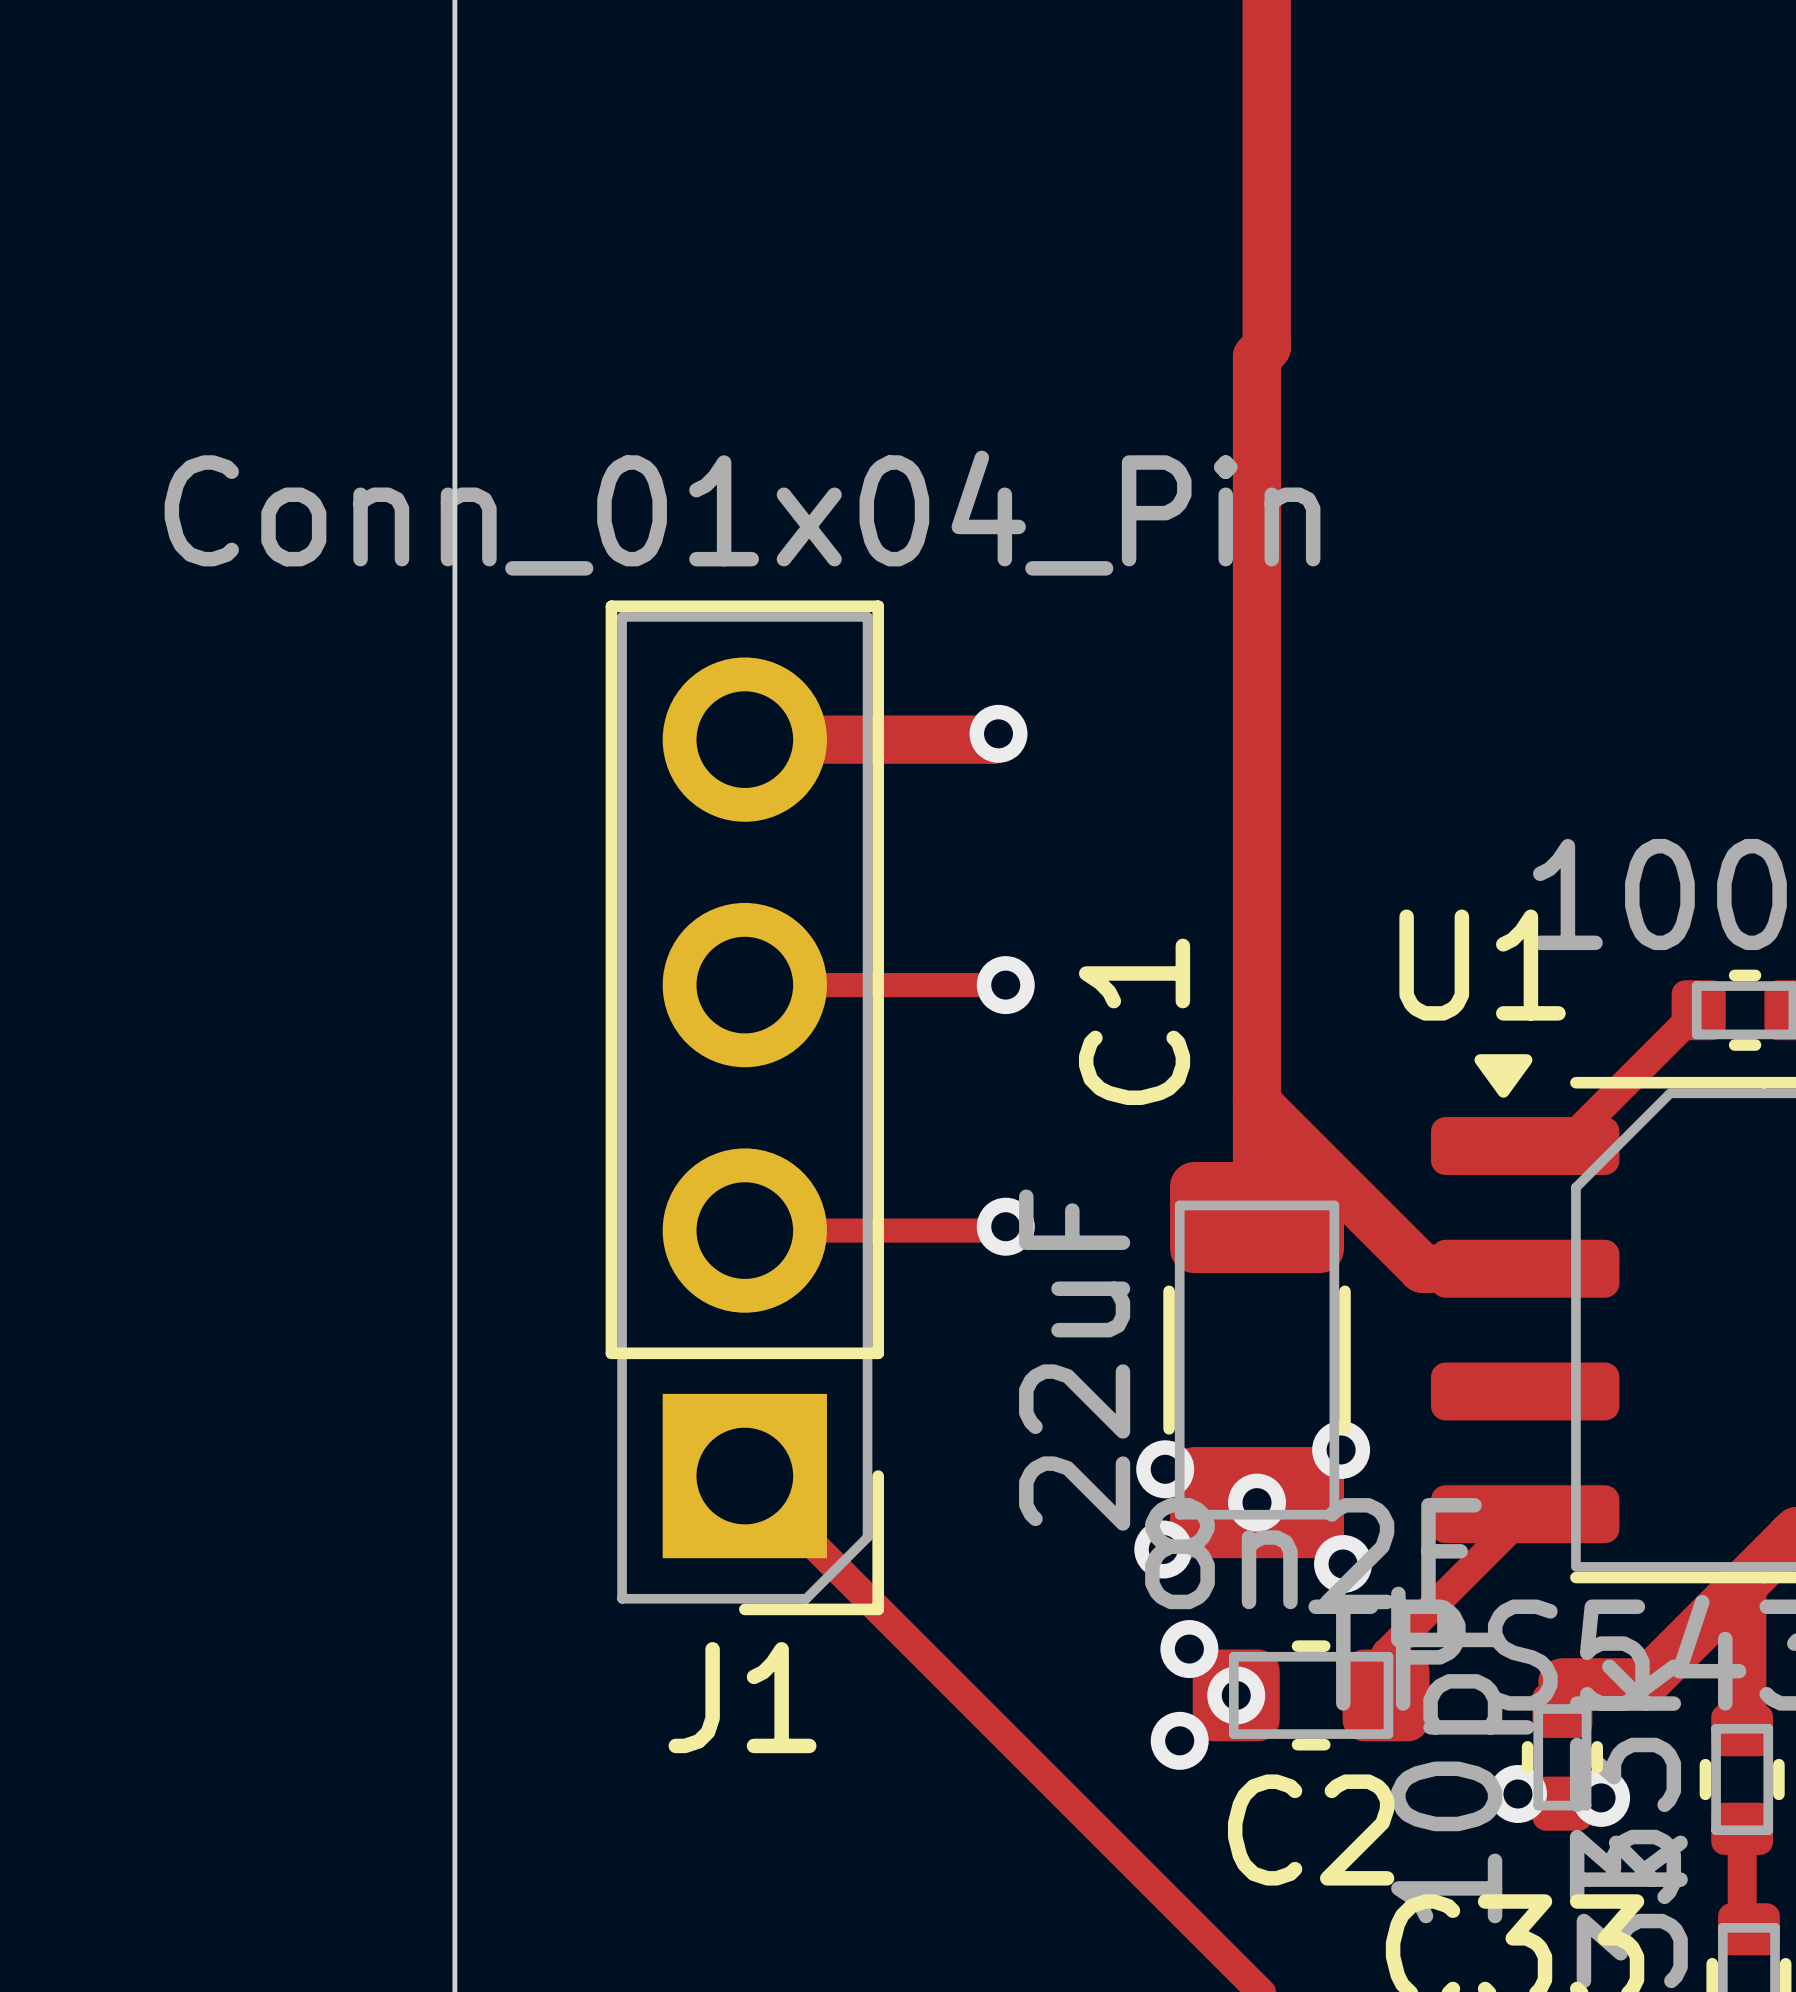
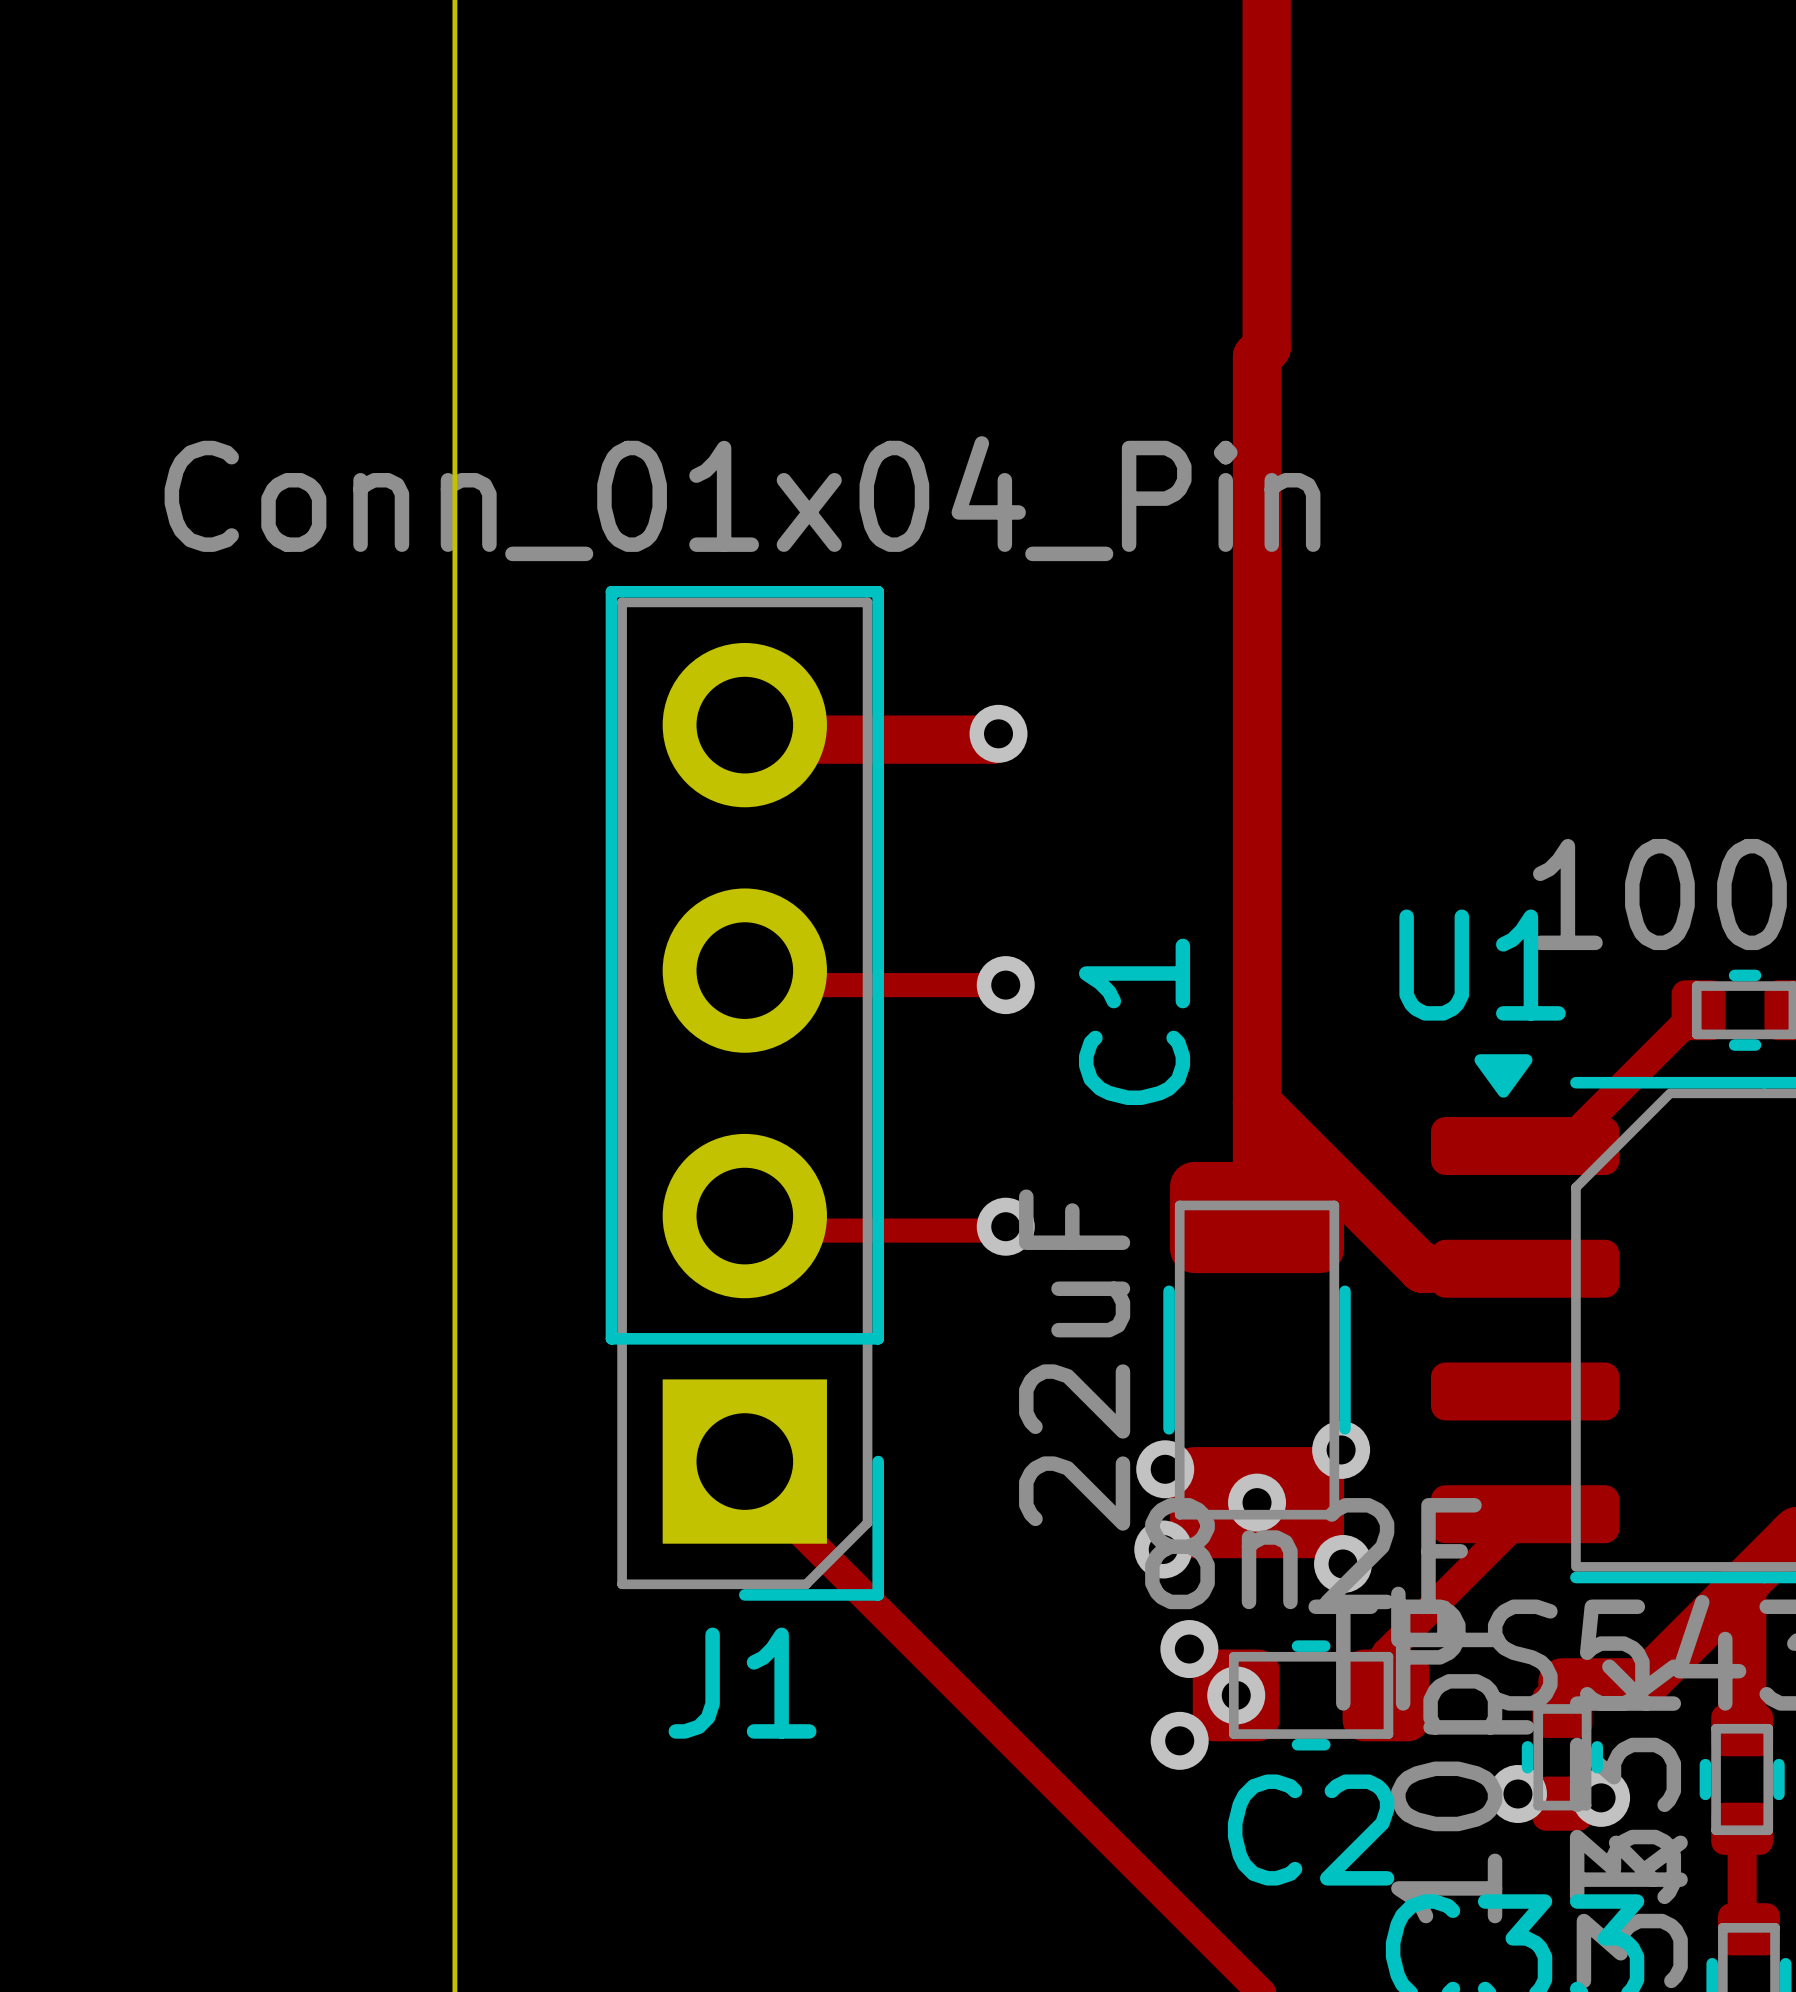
J1 position: (744, 1107) -> (744, 1093)

